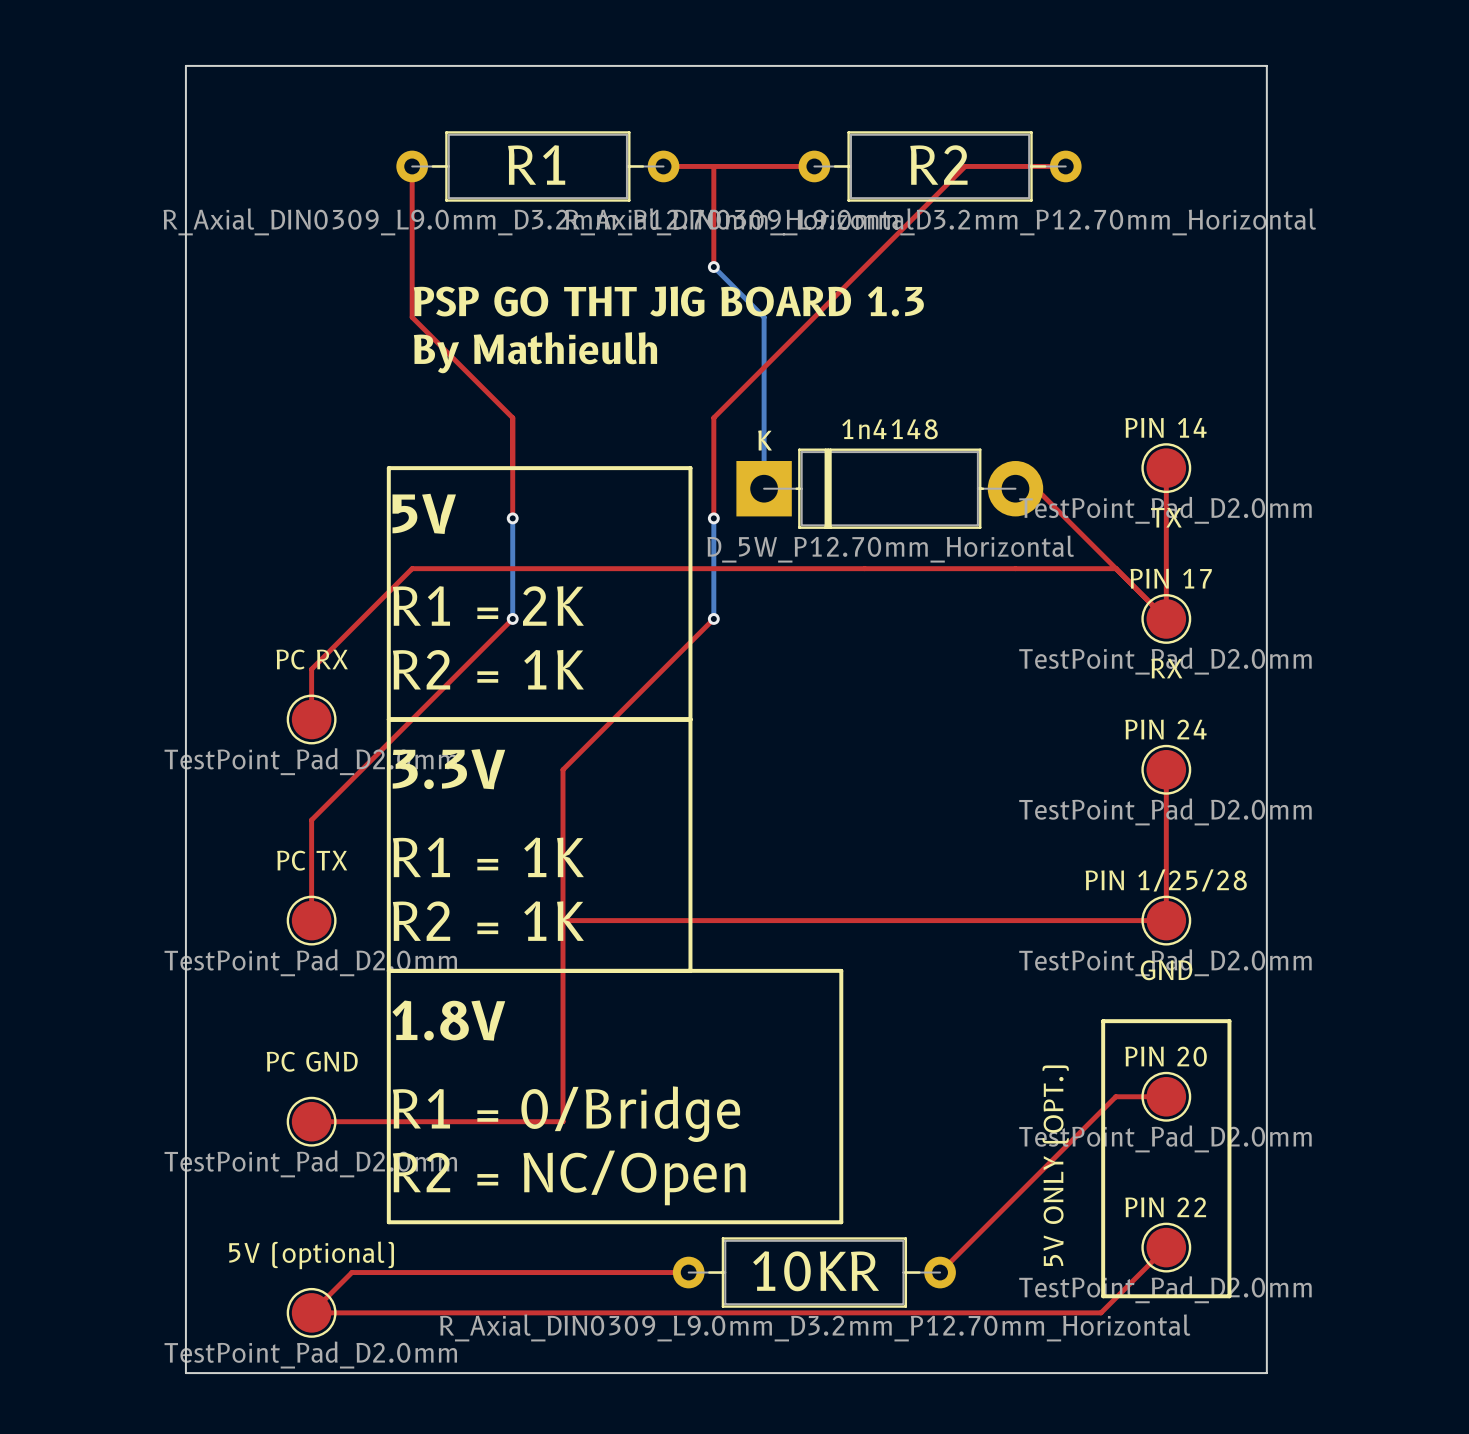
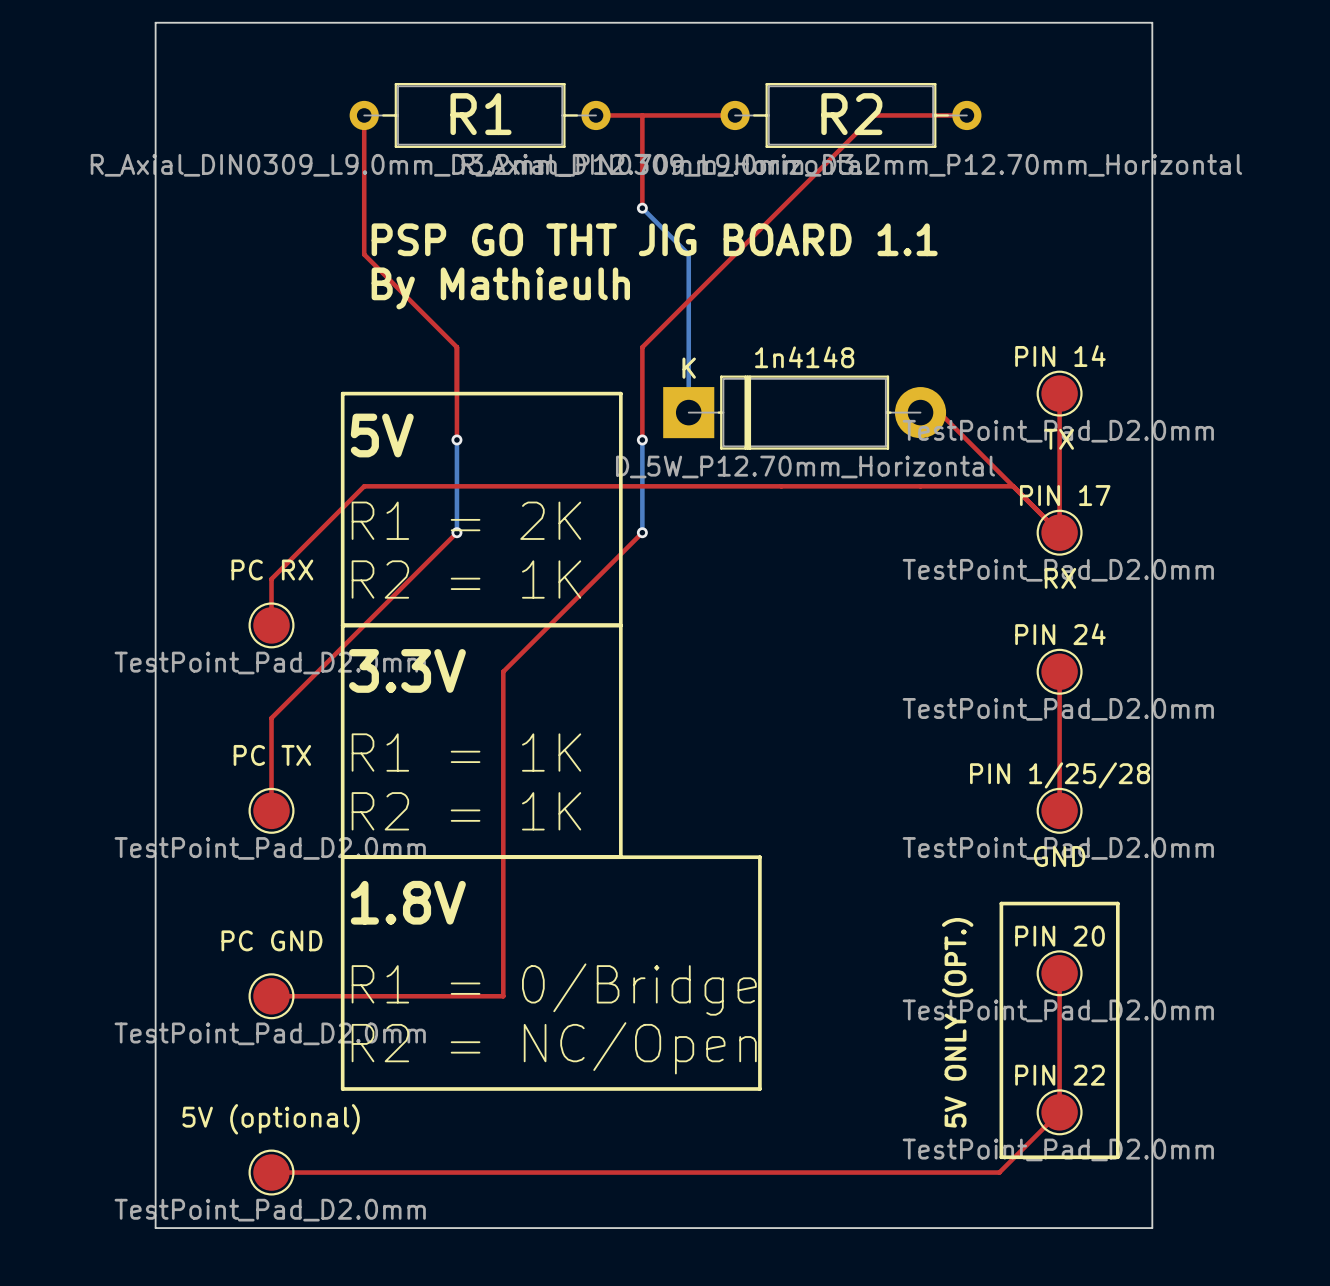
text: PSP GO THT JIG BOARD 1.3 (668, 301) -> PSP GO THT JIG BOARD 1.1 (654, 239)
top track: (563, 920) (1166, 920) -> none
top track: (1166, 1096) (1115, 1096) (940, 1272) -> (1059, 973) (1059, 1112)
top track: (688, 1272) (351, 1272) (311, 1312) -> none
10KR: R_Axial_DIN0309_L9.0mm_D3.2mm_P12.70mm_Horizontal (814, 1272) -> none

